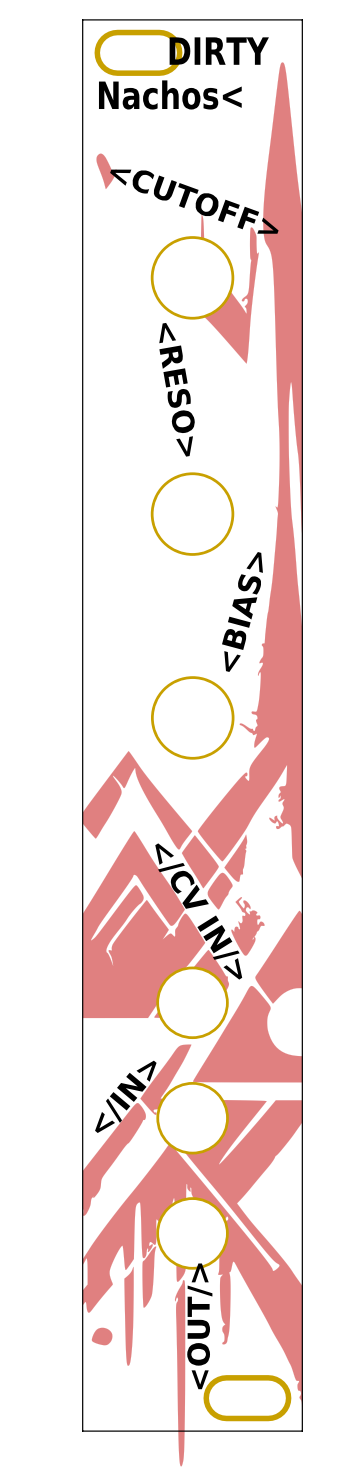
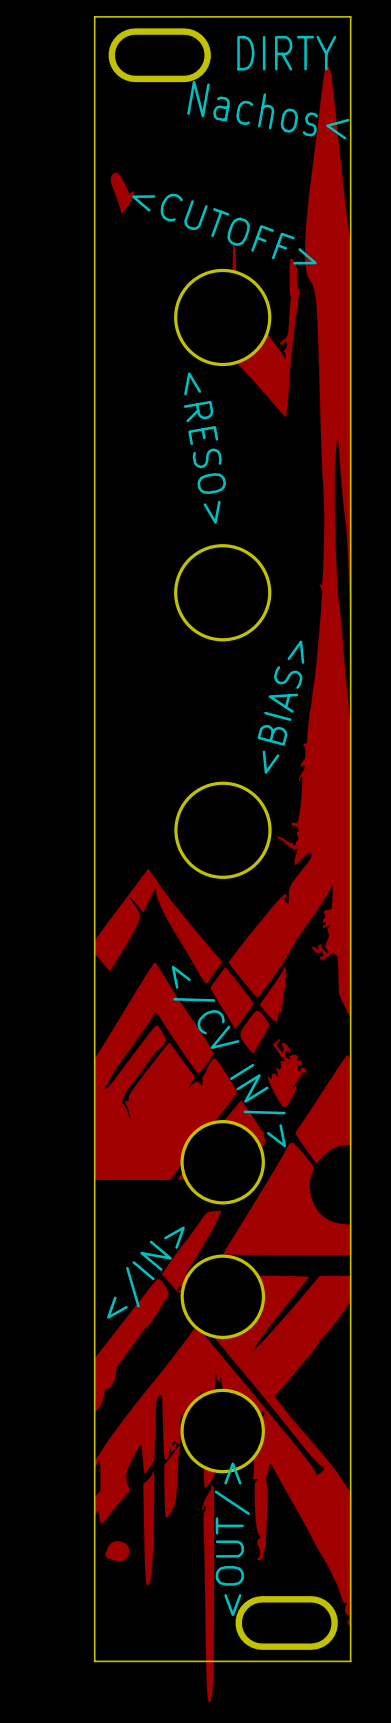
text rotation: 0° (170, 94) -> 10° clockwise (268, 110)

